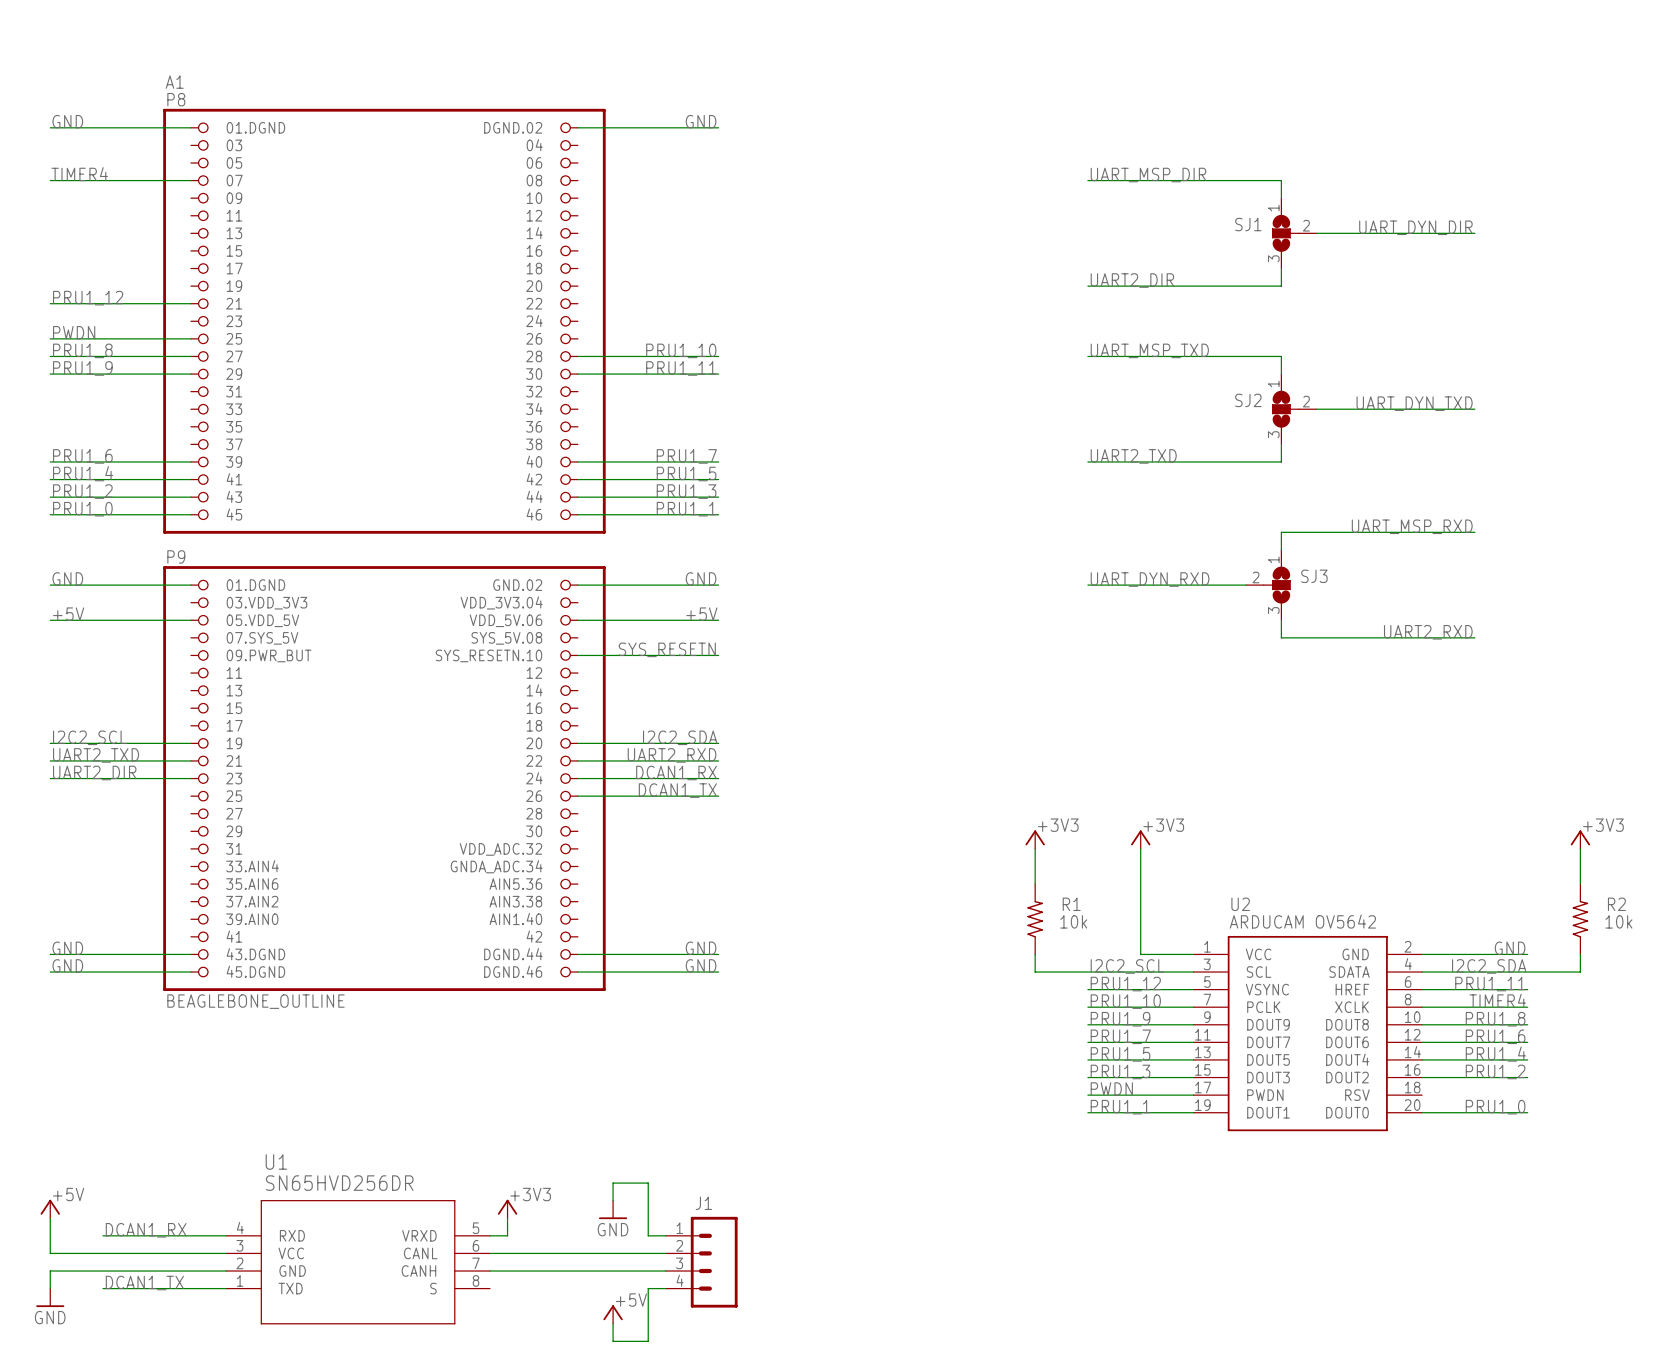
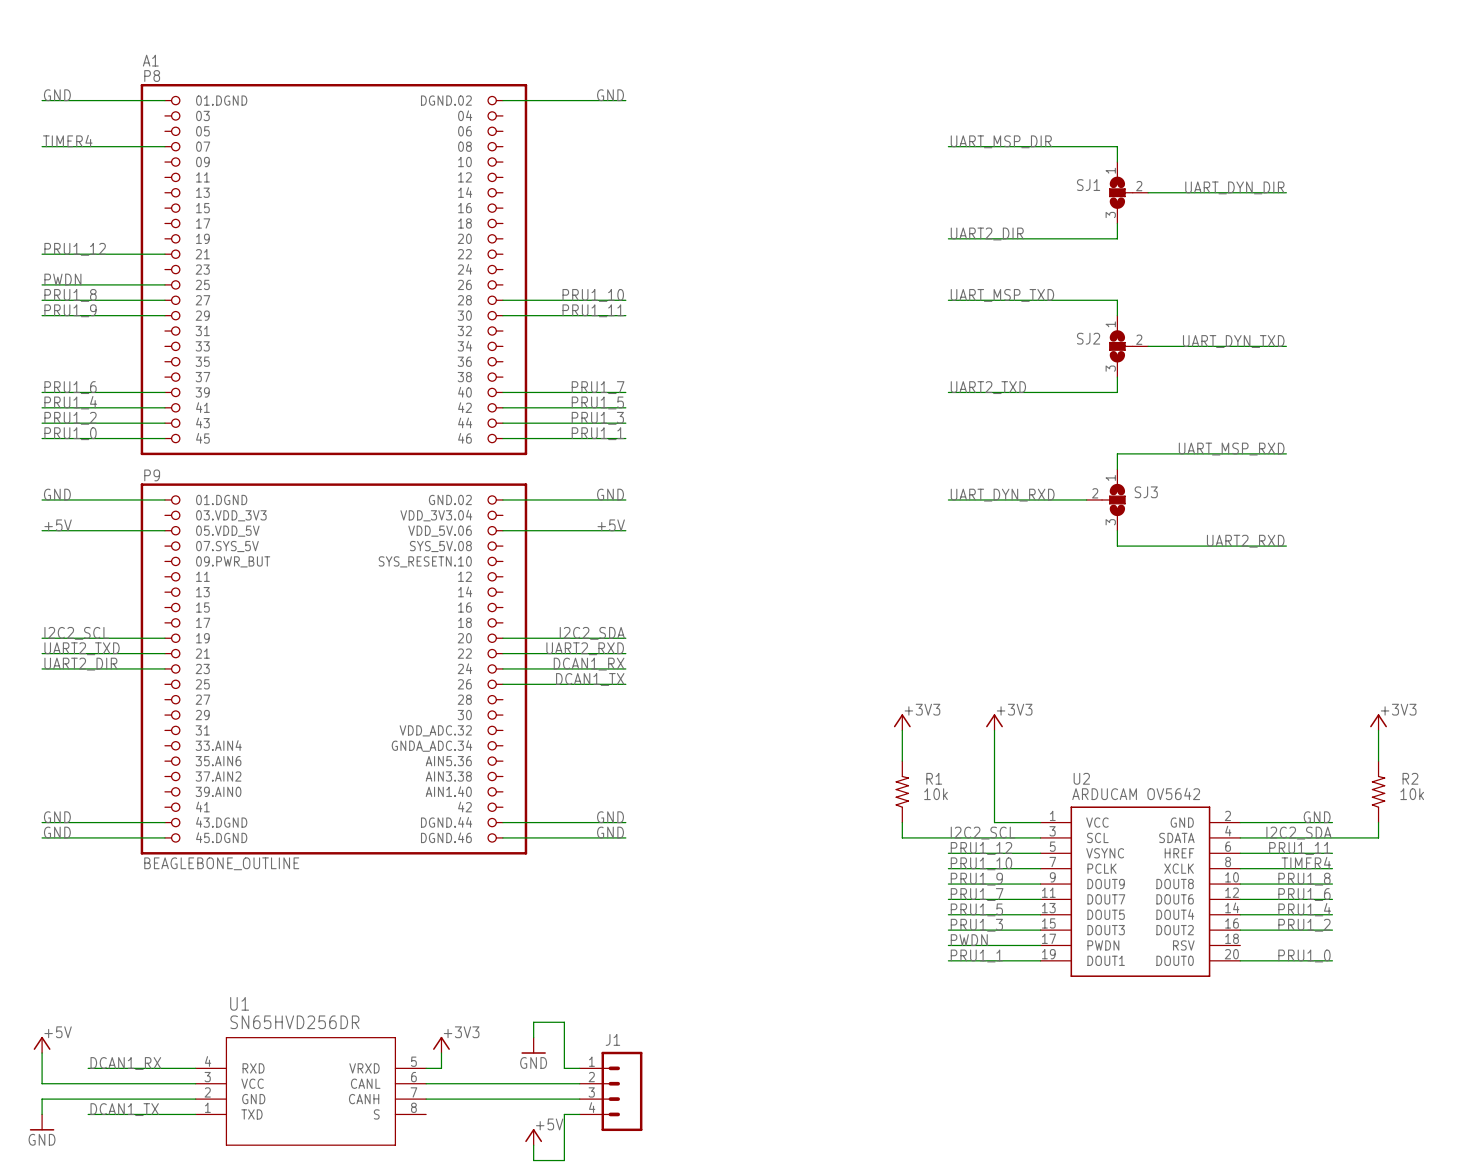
label: SYS_RESETN (667, 649) -> none
wire: (577, 655) (718, 655) -> none

